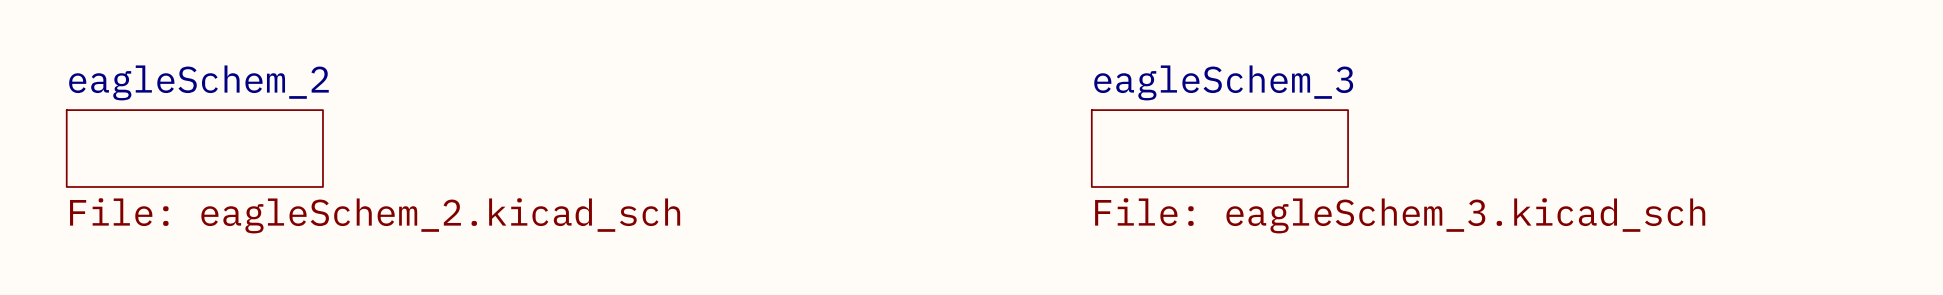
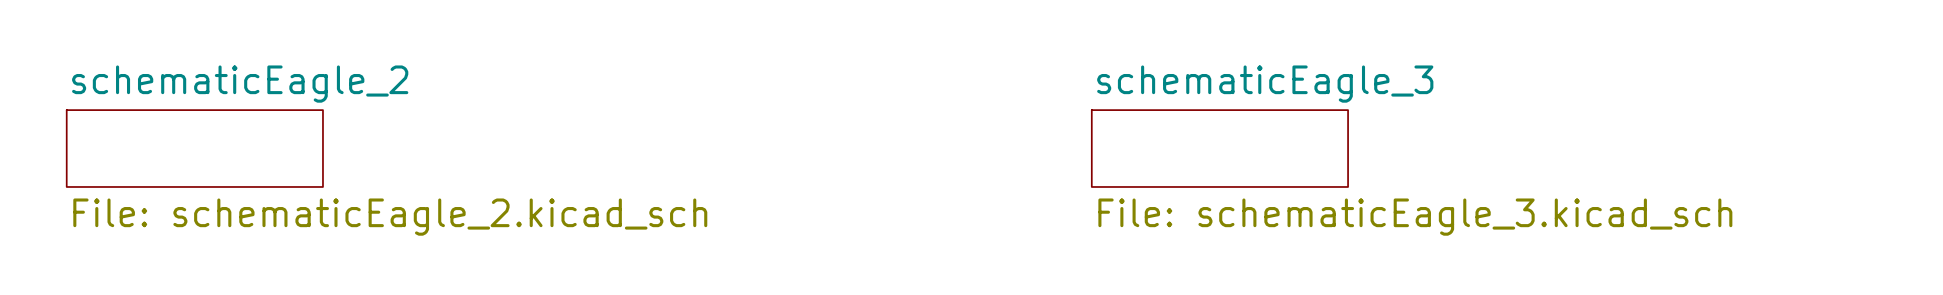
sheet eagleSchem_2 name: eagleSchem_2 (198, 82) -> schematicEagle_2 (240, 84)
sheet eagleSchem_3 name: eagleSchem_3 (1223, 82) -> schematicEagle_3 (1265, 84)
sheet eagleSchem_2 value: File: eagleSchem_2.kicad_sch (375, 215) -> File: schematicEagle_2.kicad_sch (390, 217)
sheet eagleSchem_3 value: File: eagleSchem_3.kicad_sch (1400, 215) -> File: schematicEagle_3.kicad_sch (1415, 217)

